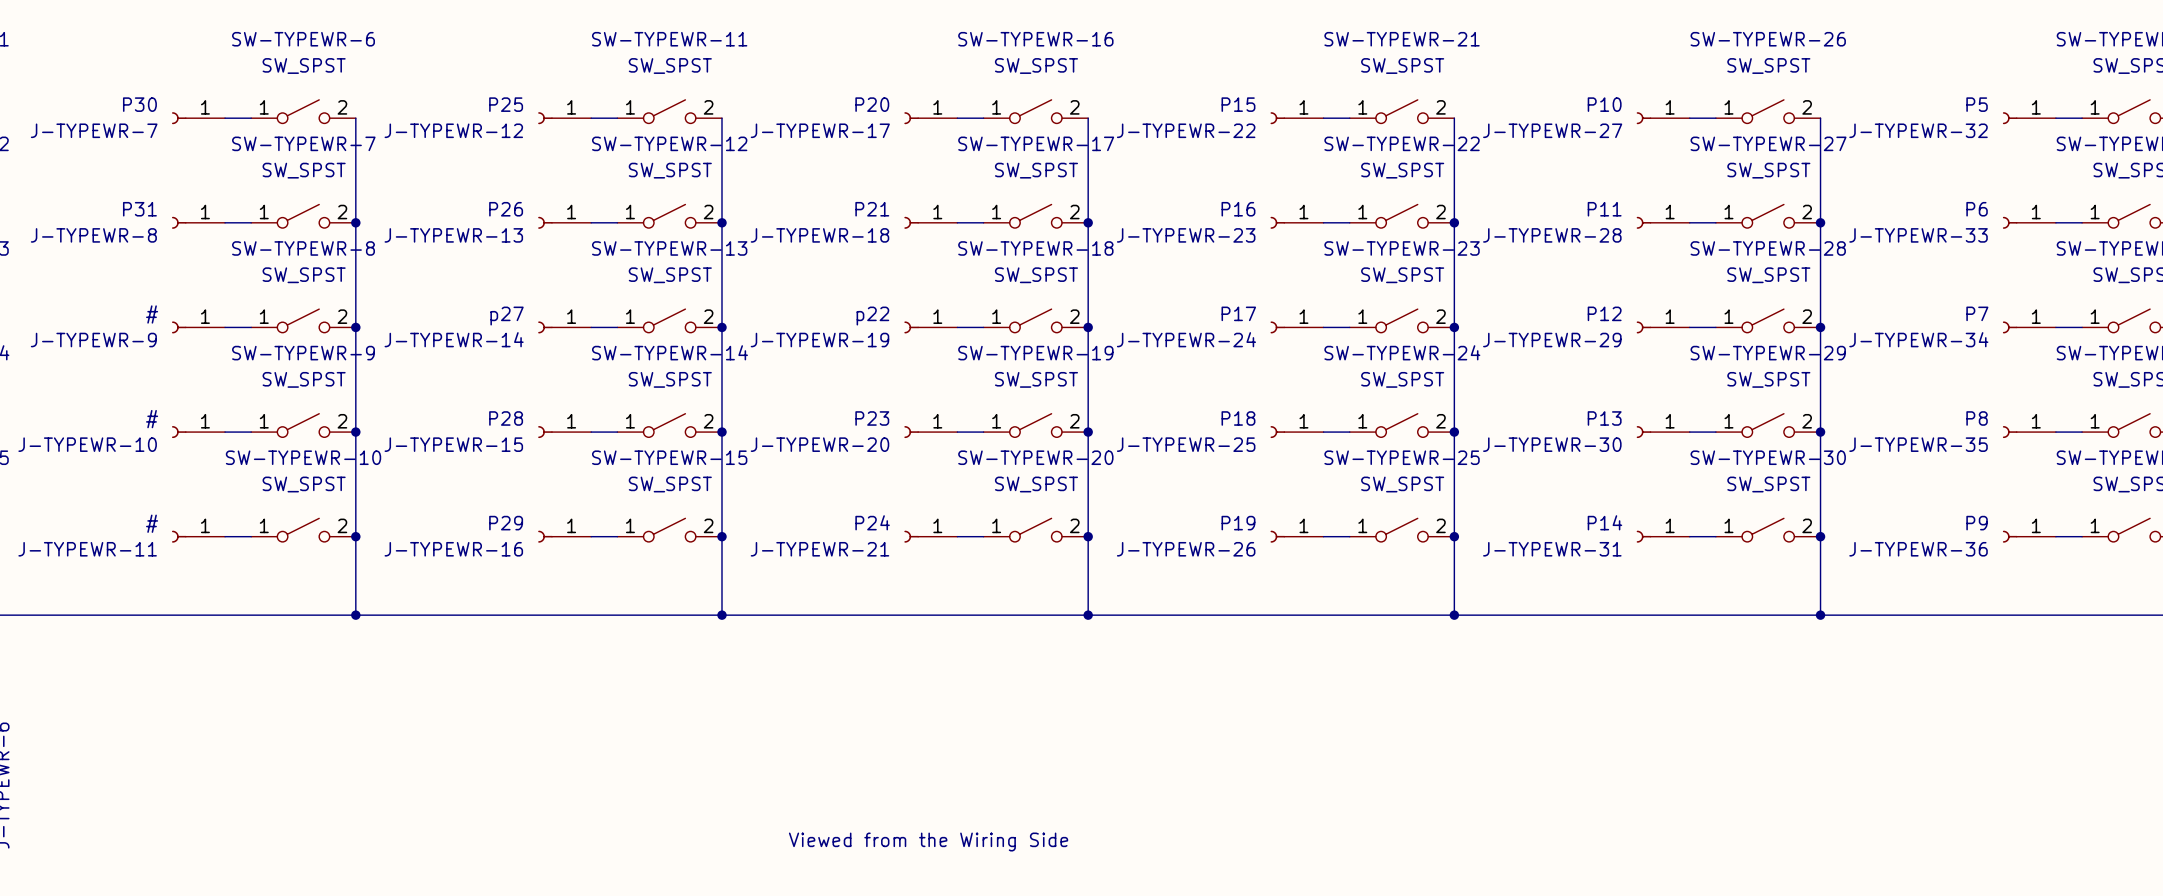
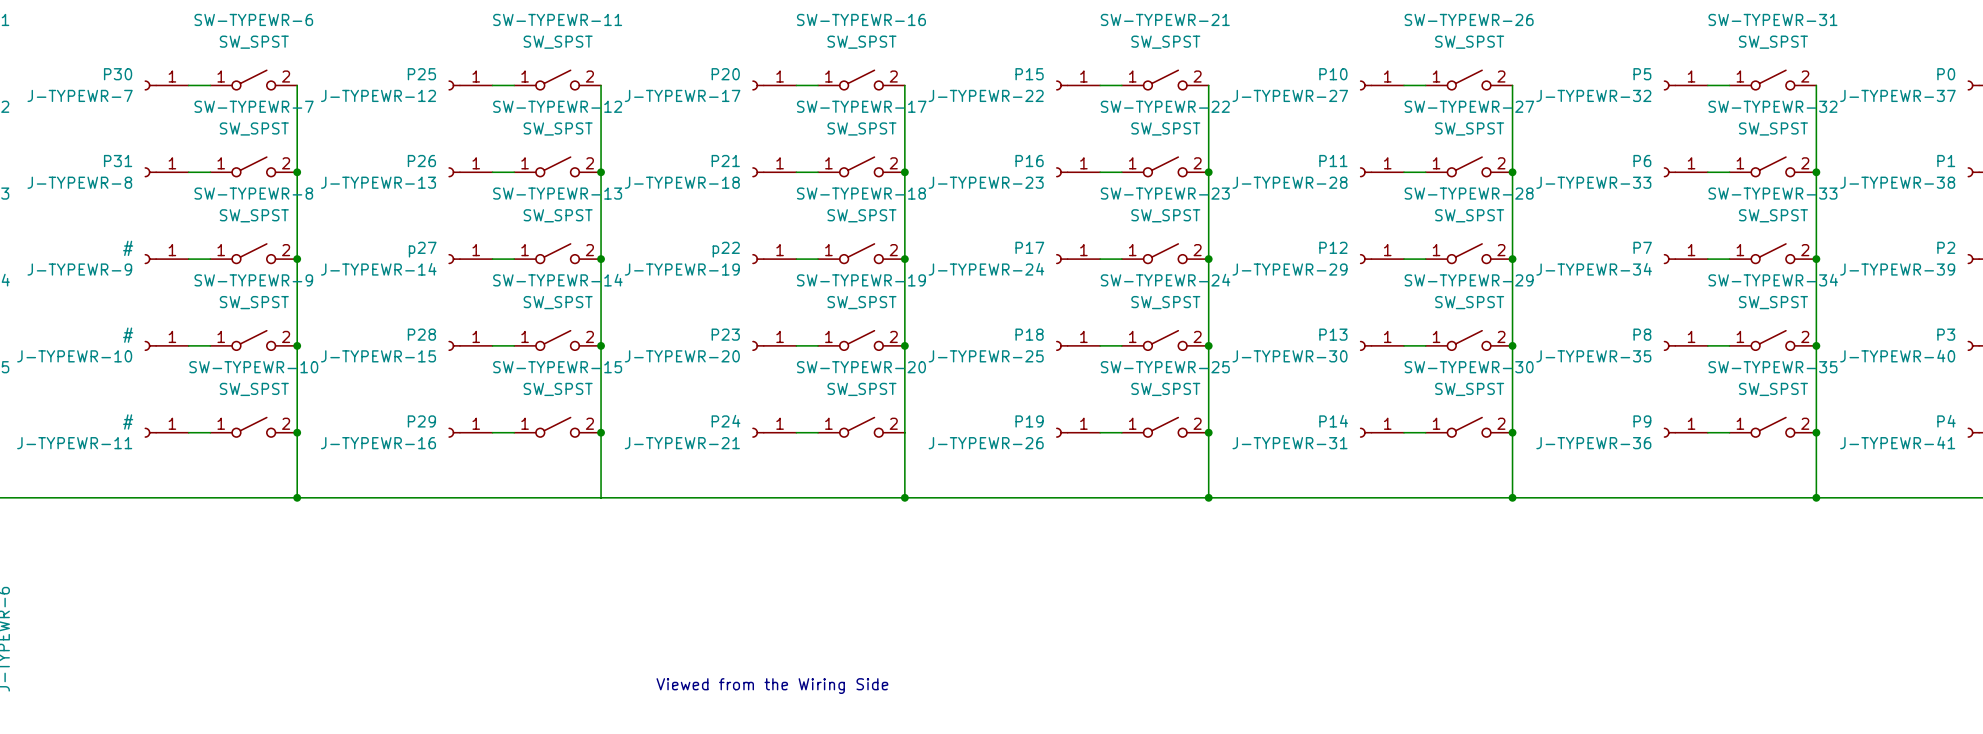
junction: (1088, 536) -> none
junction: (721, 615) -> none

